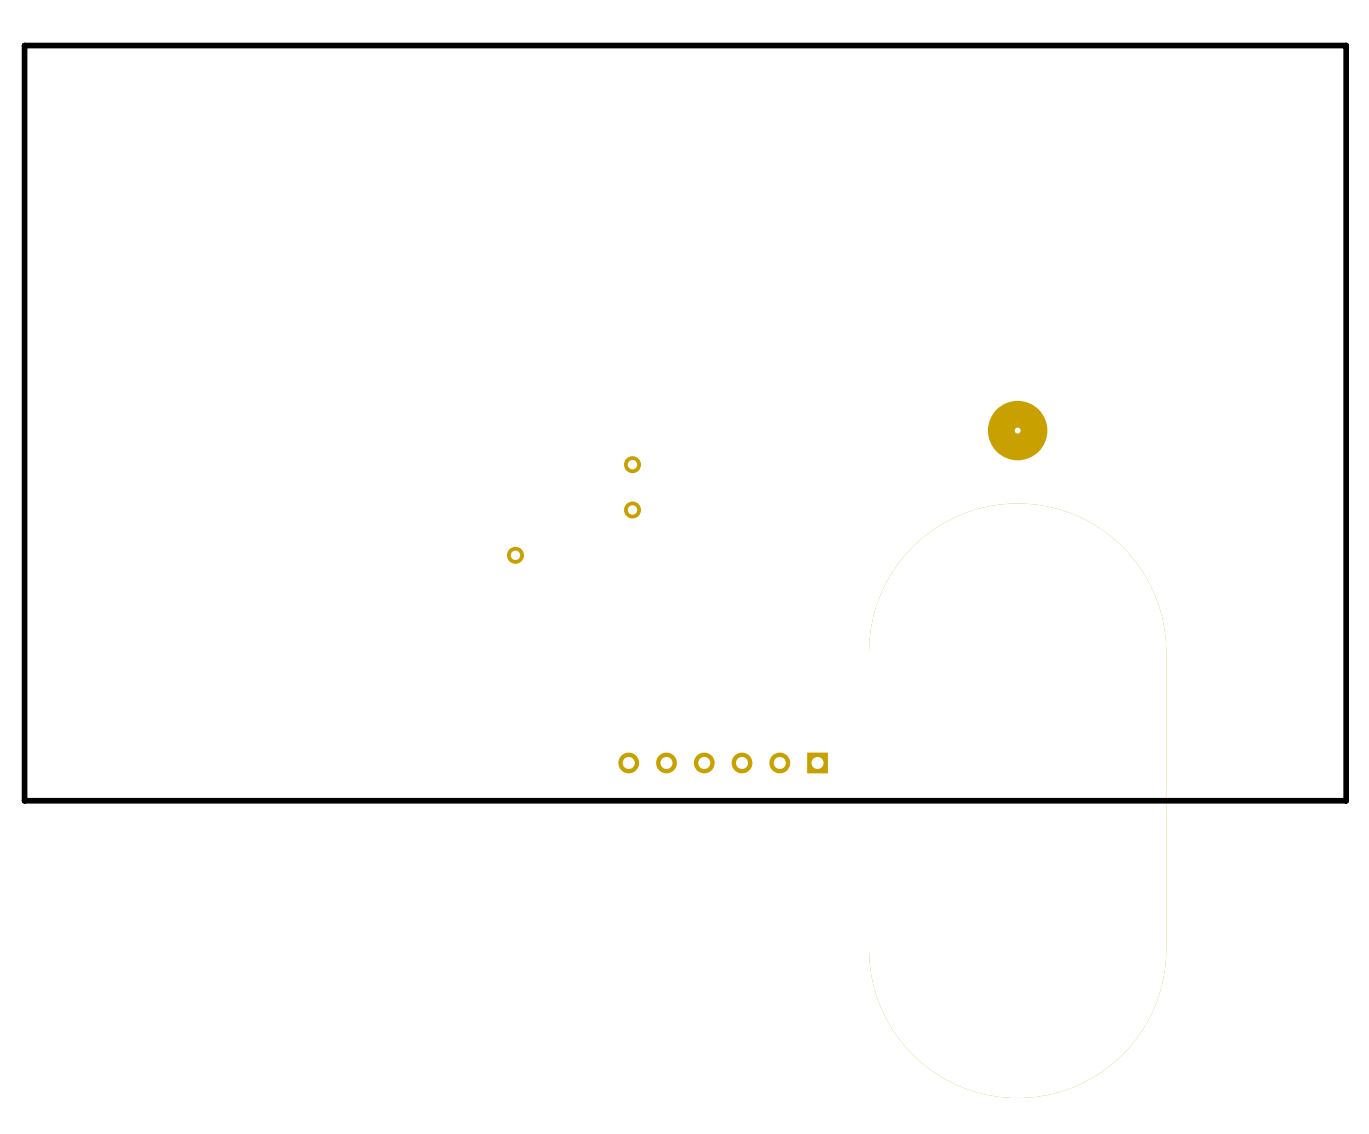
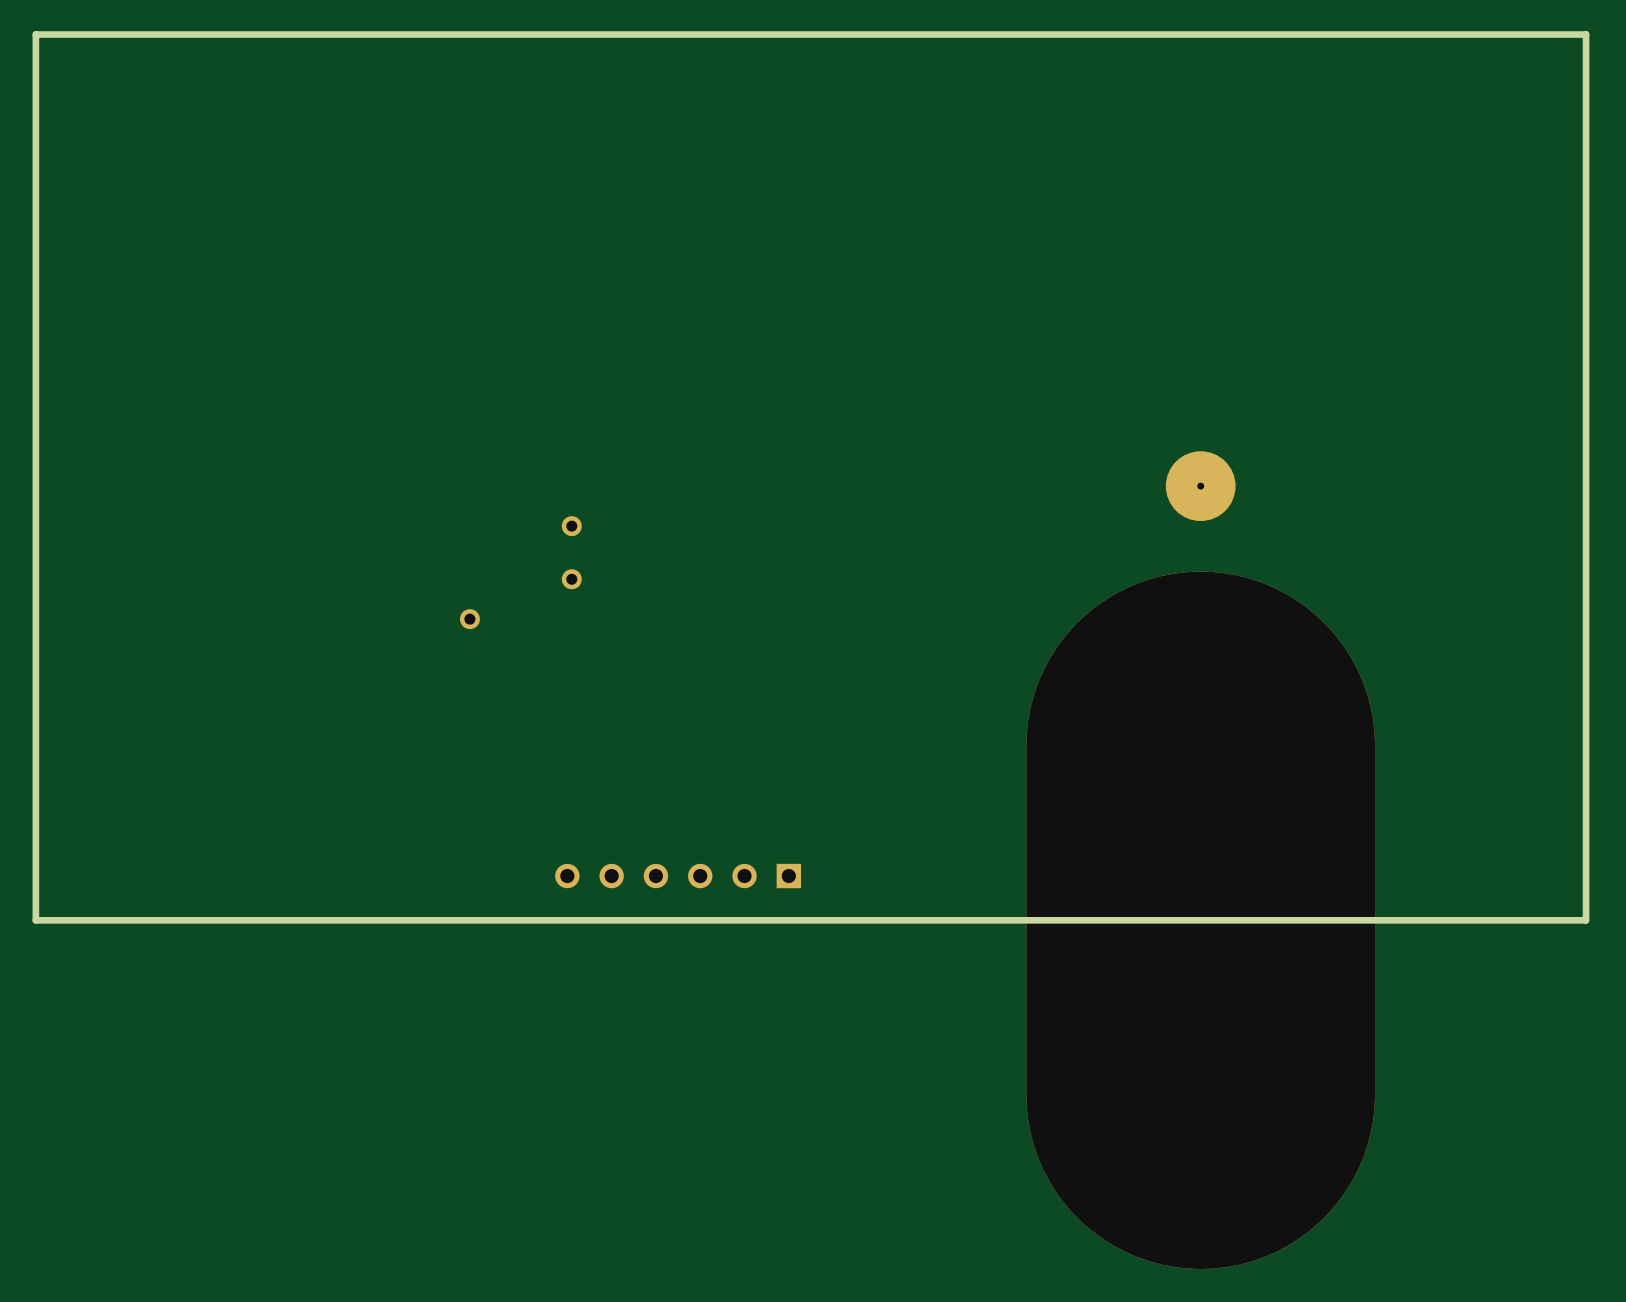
part: none -> (571, 526)
part: (632, 464) -> none
part: none -> (571, 579)
part: (632, 509) -> none
part: none -> (469, 619)
part: (515, 555) -> none
part position: (723, 762) -> (678, 876)

